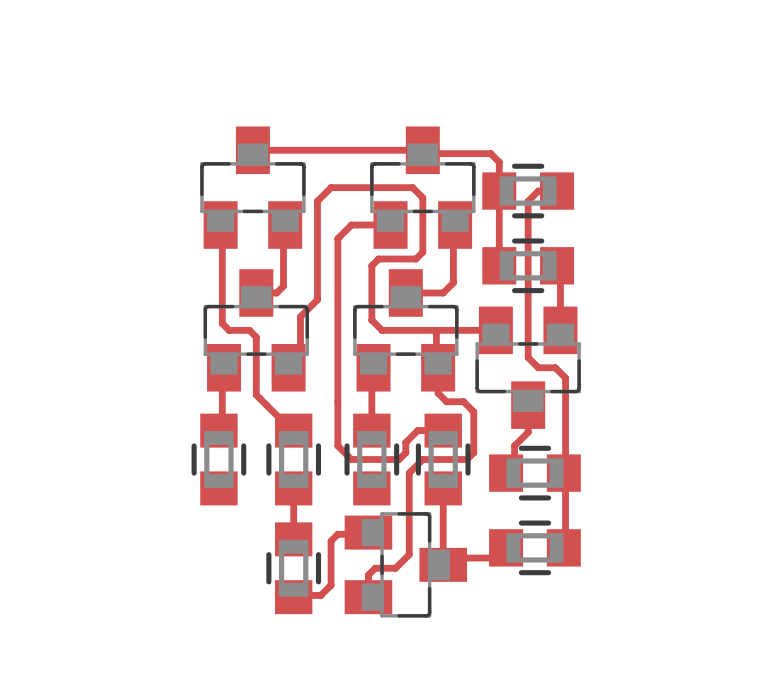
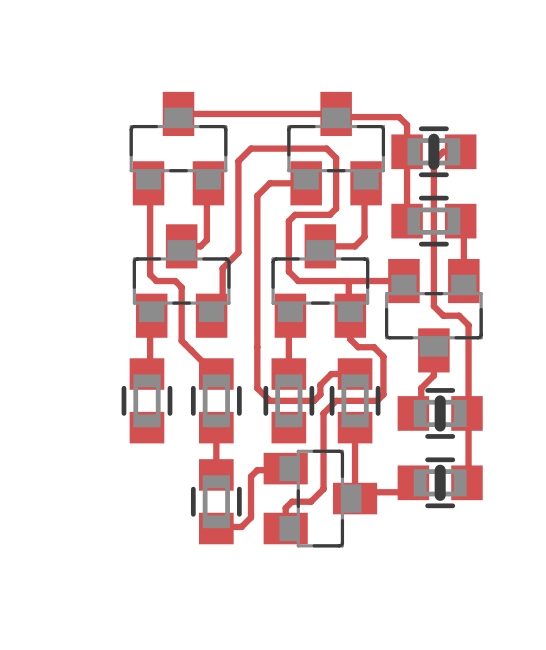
part footprint: [482, 163, 575, 219] -> [391, 126, 477, 178]
part footprint: [489, 445, 581, 501] -> [397, 388, 483, 439]
part footprint: [489, 520, 581, 576] -> [397, 457, 483, 509]

